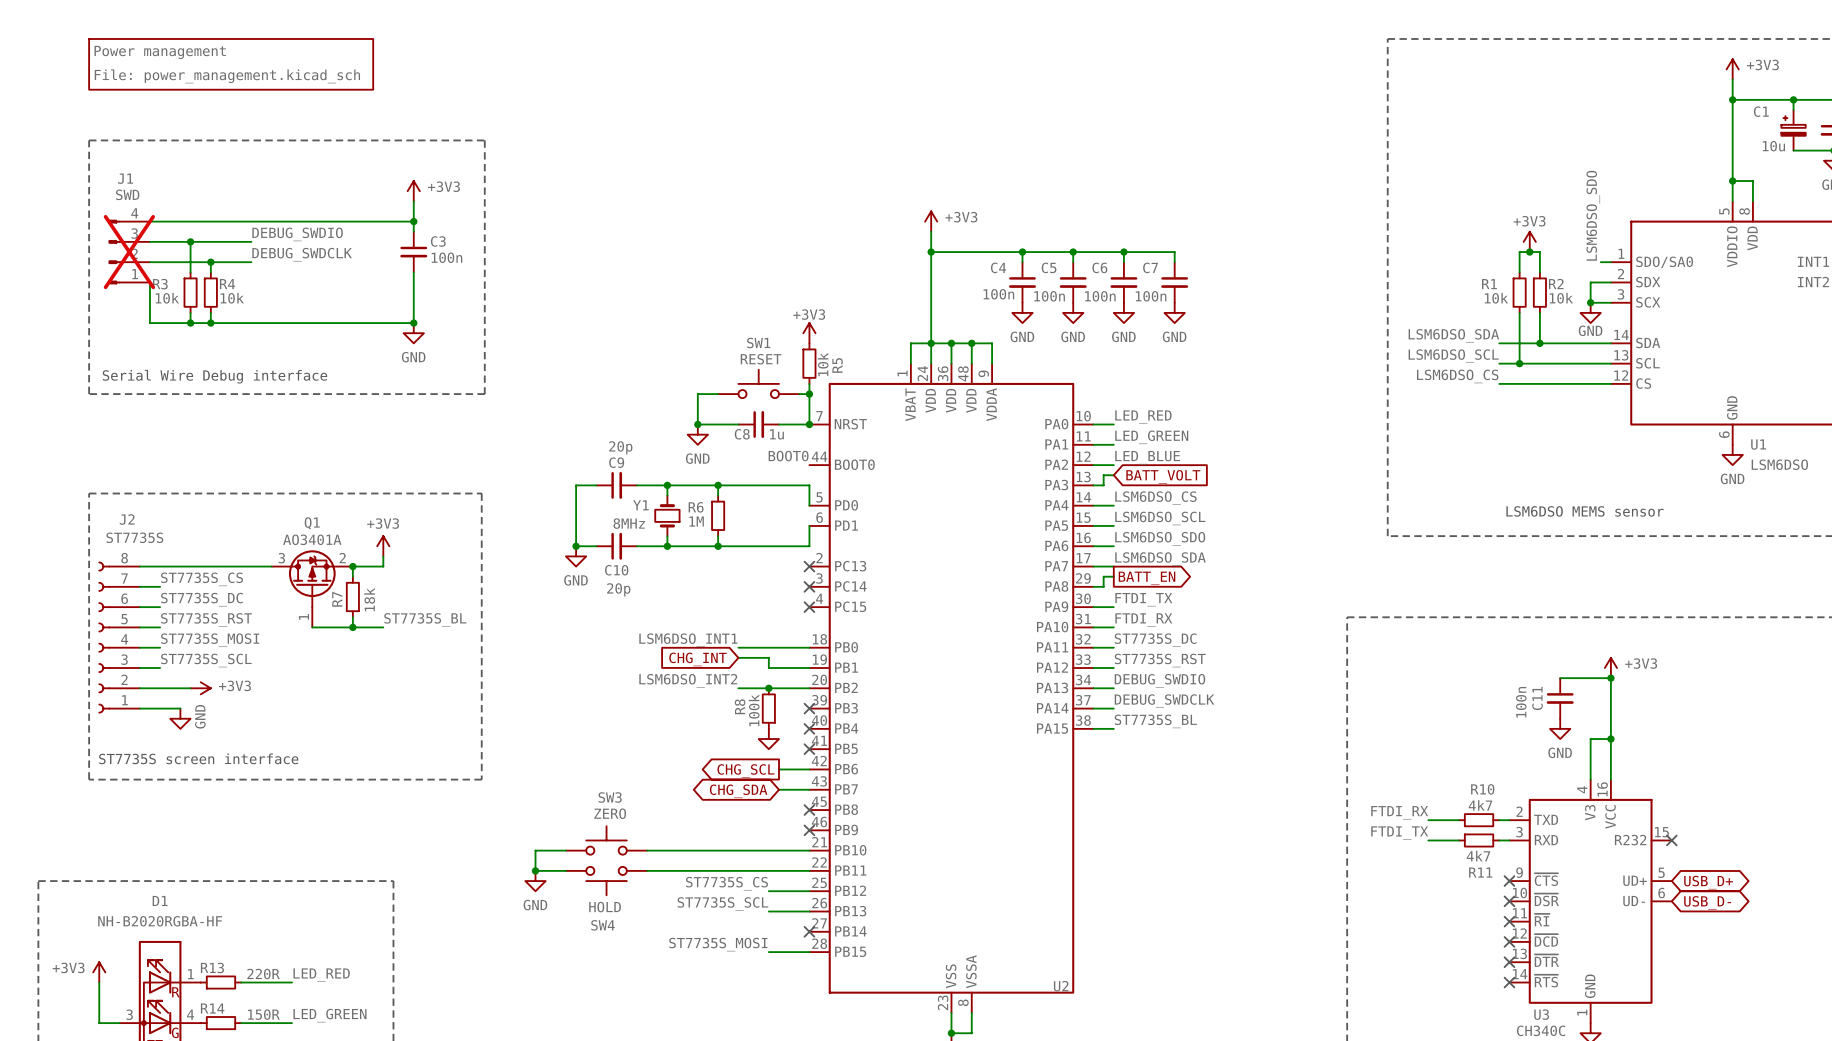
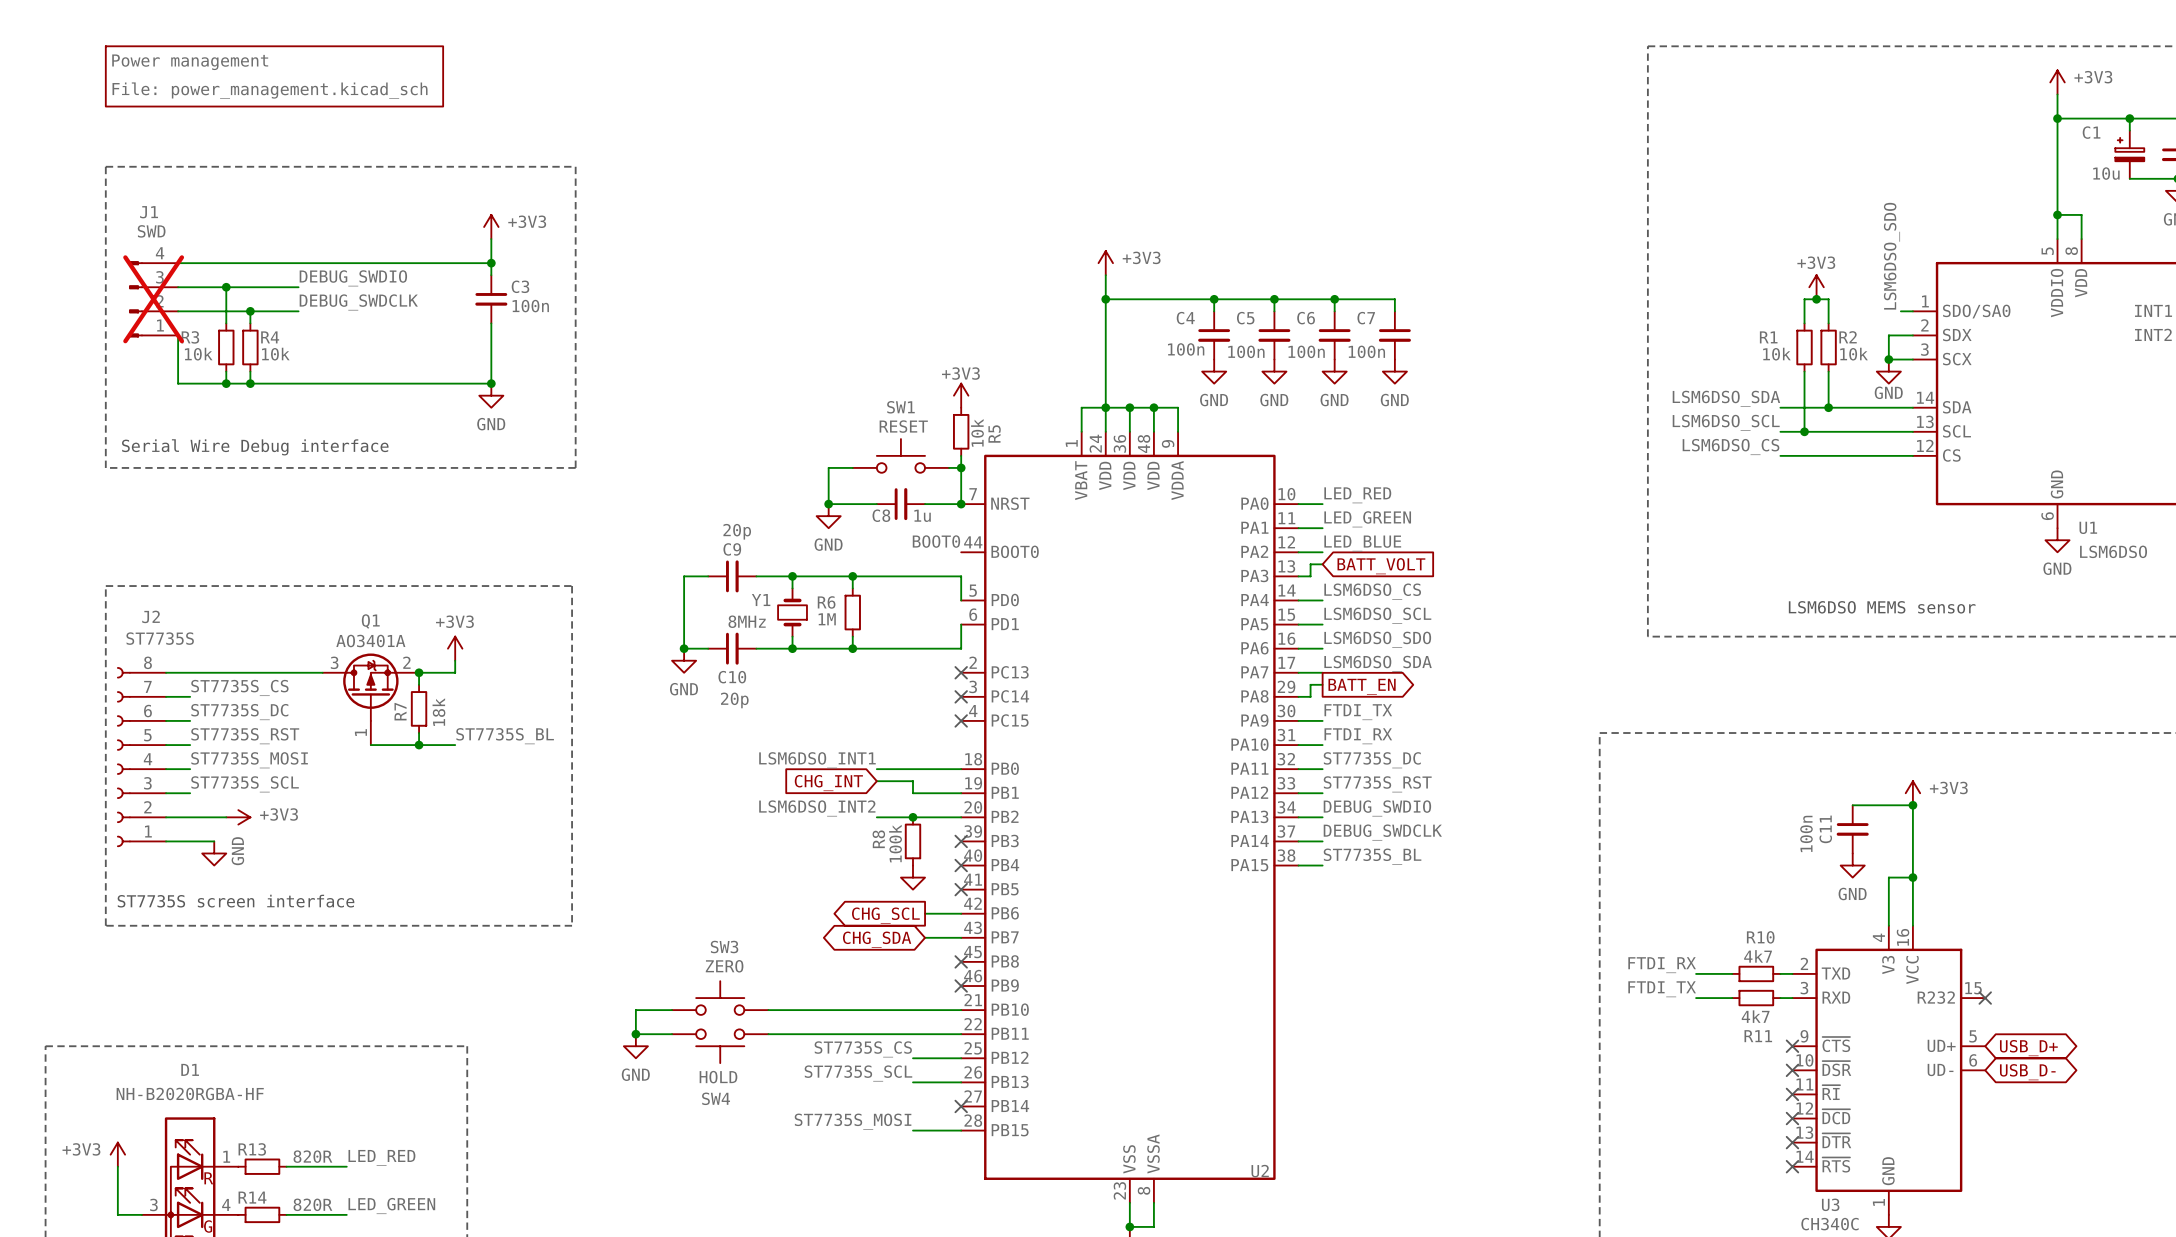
R13 value: 220R (263, 974) -> 820R (312, 1156)
R14 value: 150R (263, 1014) -> 820R (312, 1204)

